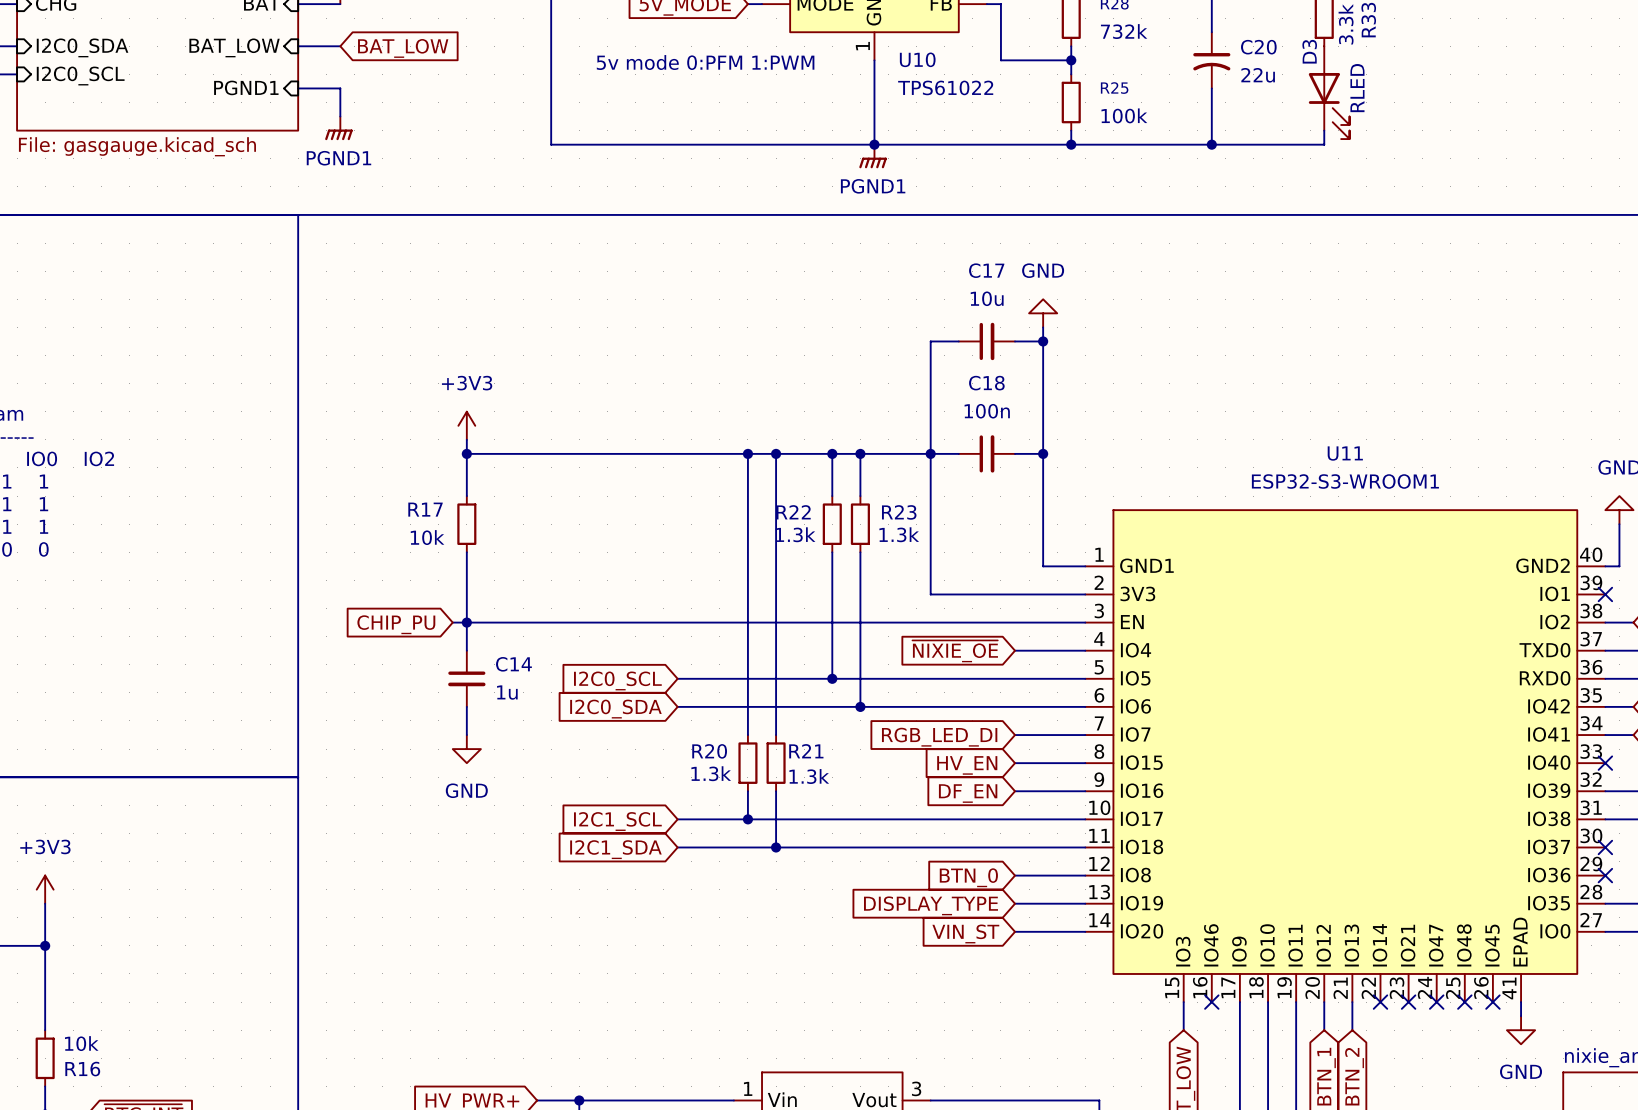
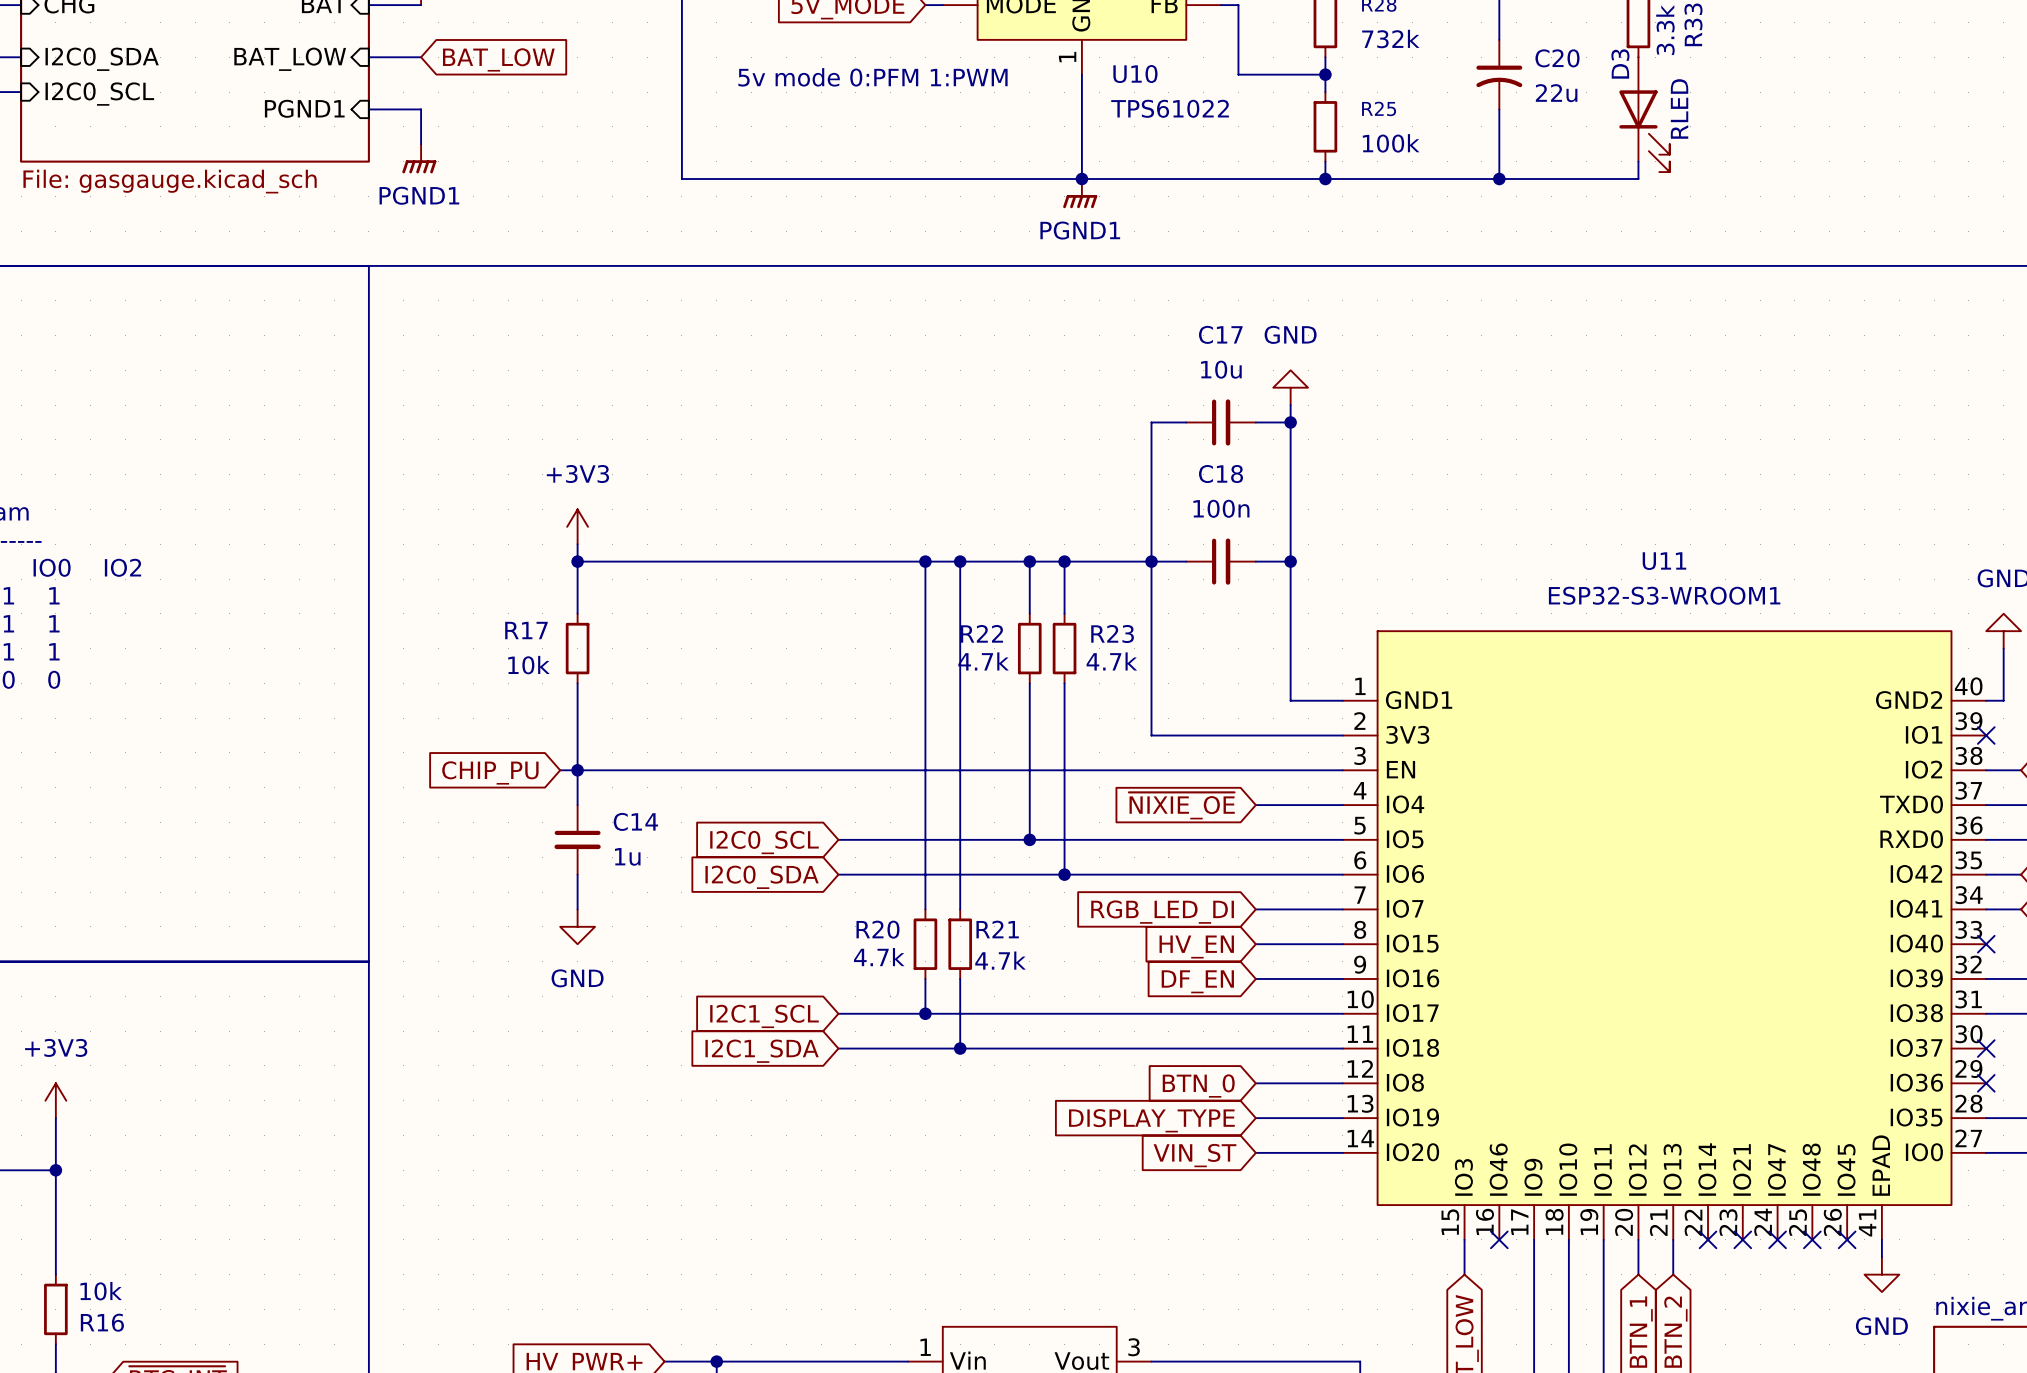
R22 value: 1.3k (795, 534) -> 4.7k (983, 661)
R23 value: 1.3k (899, 534) -> 4.7k (1111, 661)
R20 value: 1.3k (711, 773) -> 4.7k (879, 957)
R21 value: 1.3k (809, 776) -> 4.7k (1000, 960)

